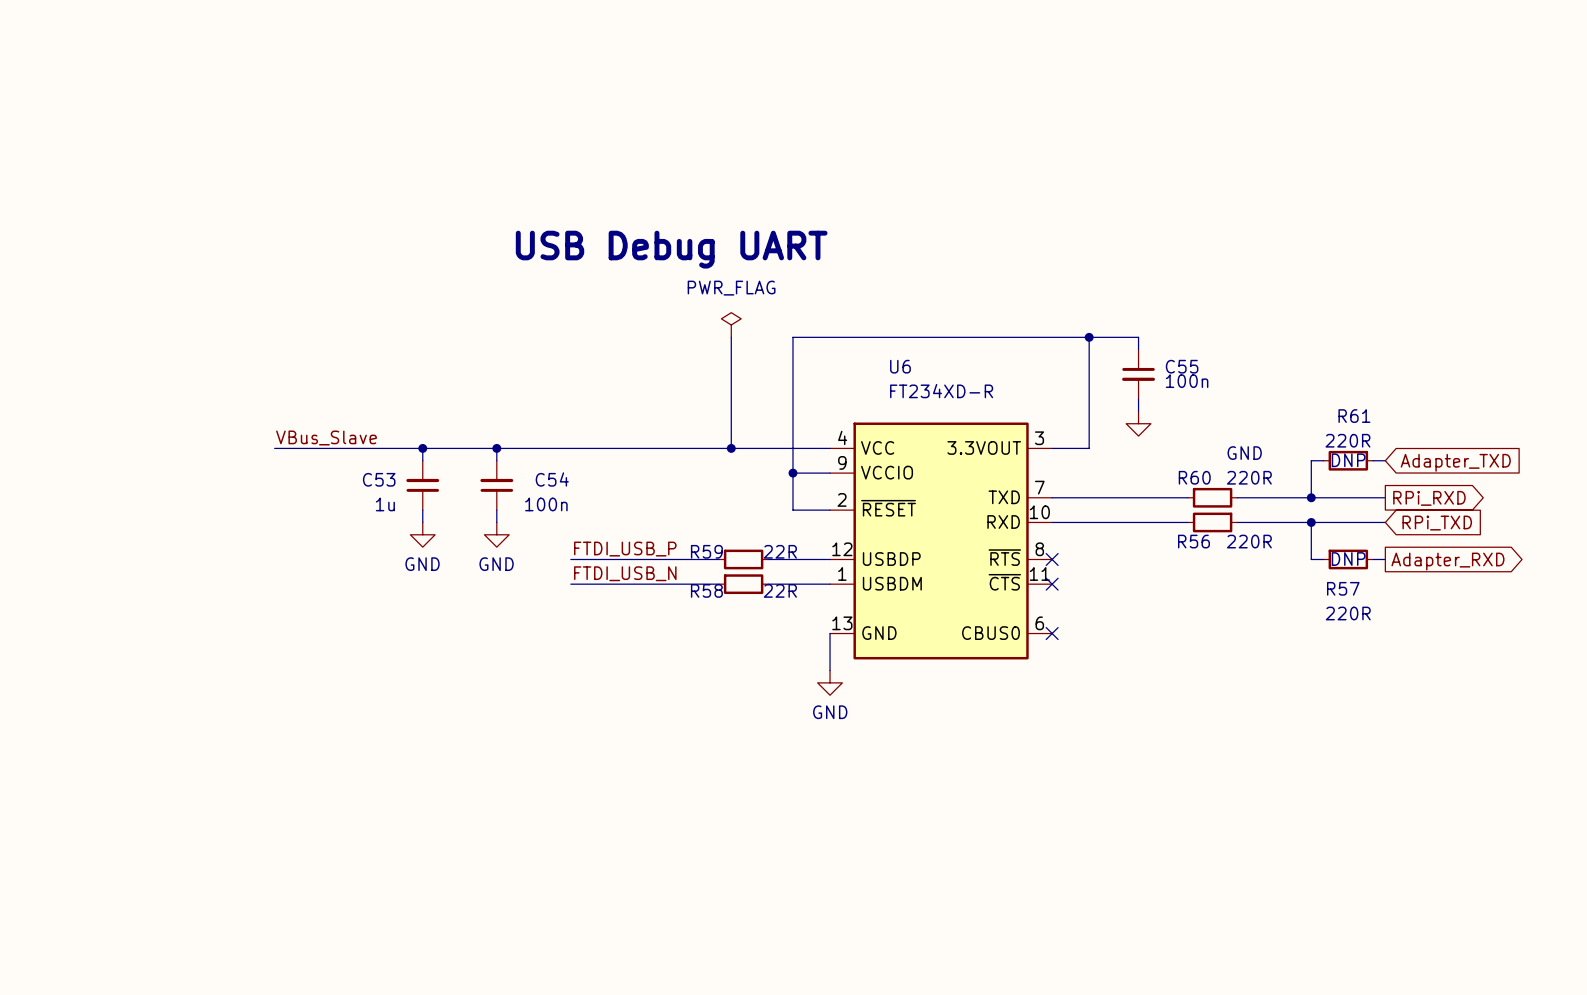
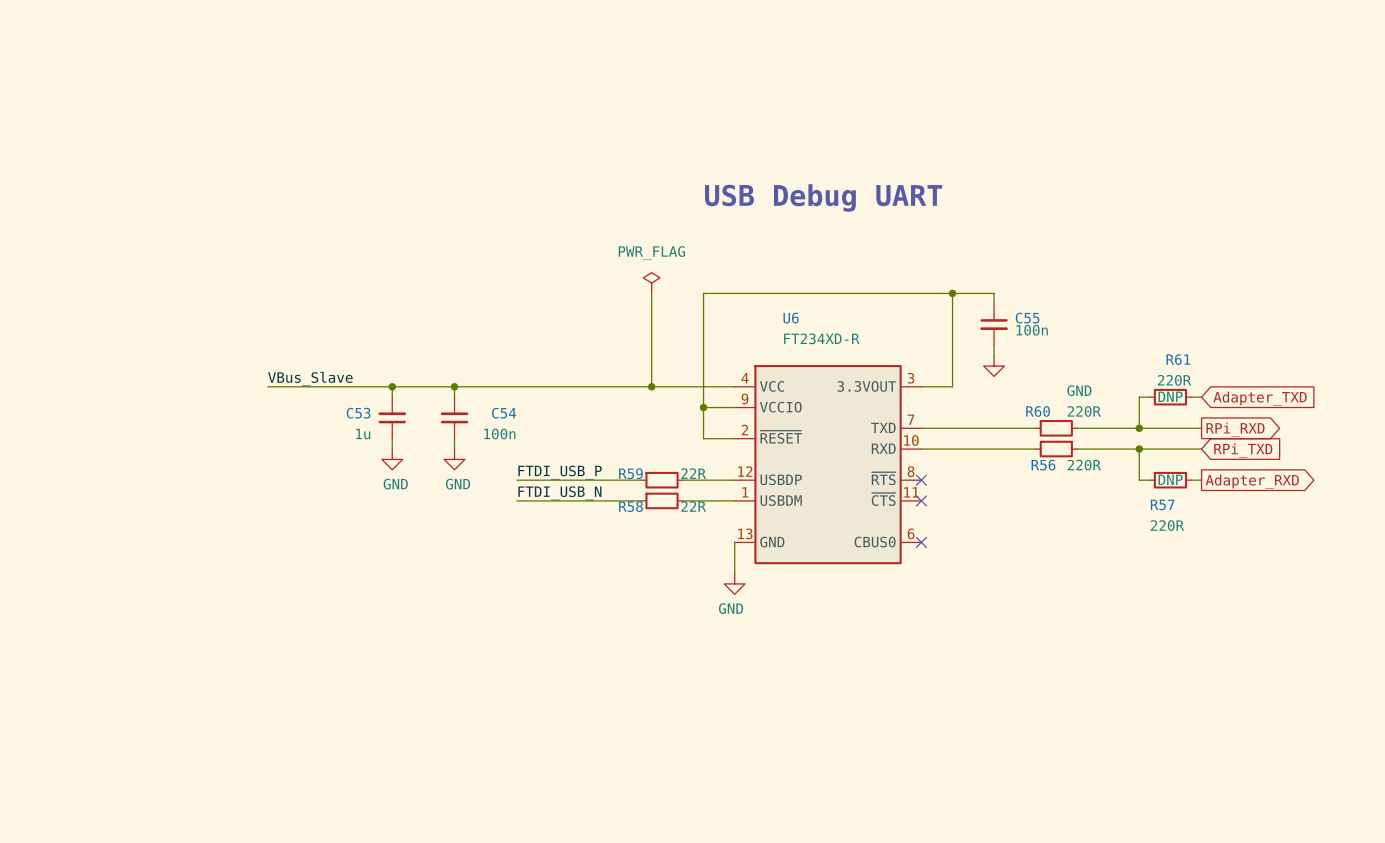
text: none -> USB Debug UART (823, 197)
text: USB Debug UART (671, 249) -> none

